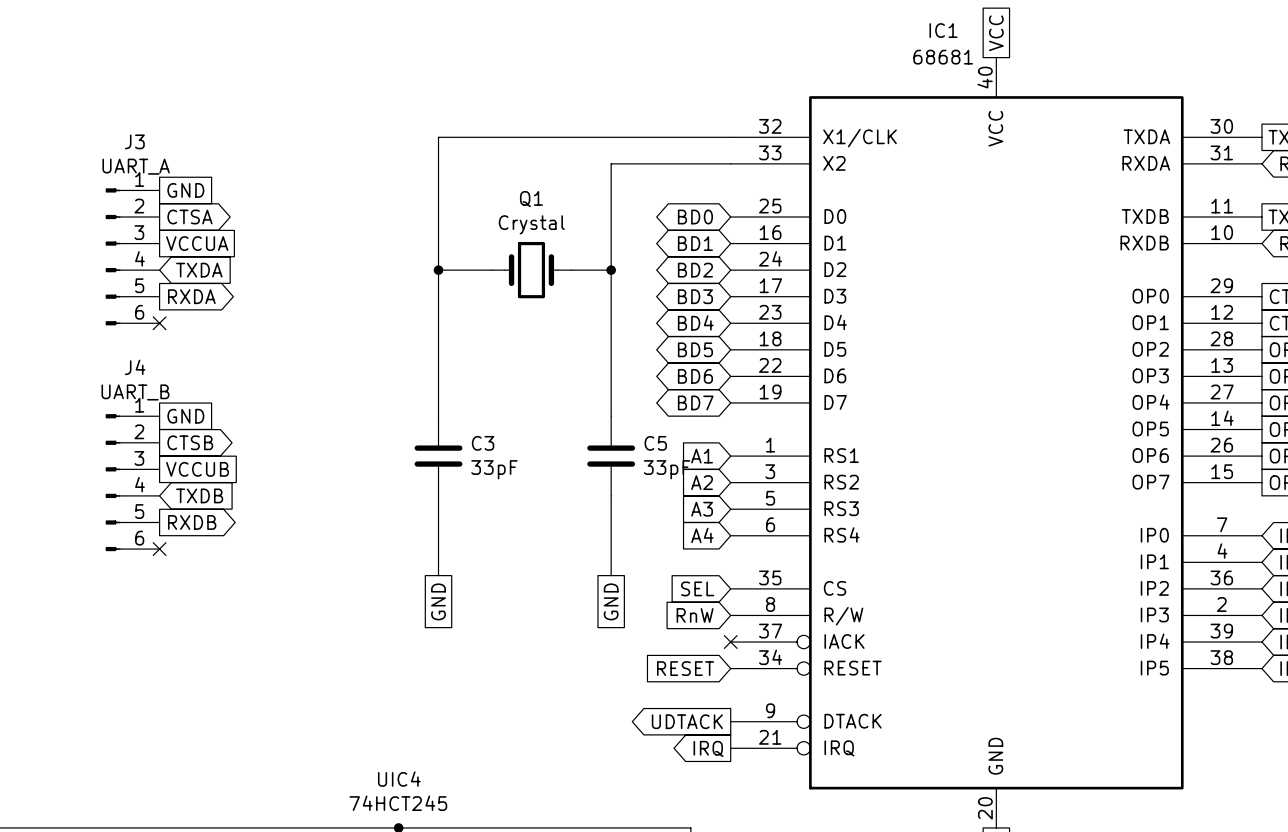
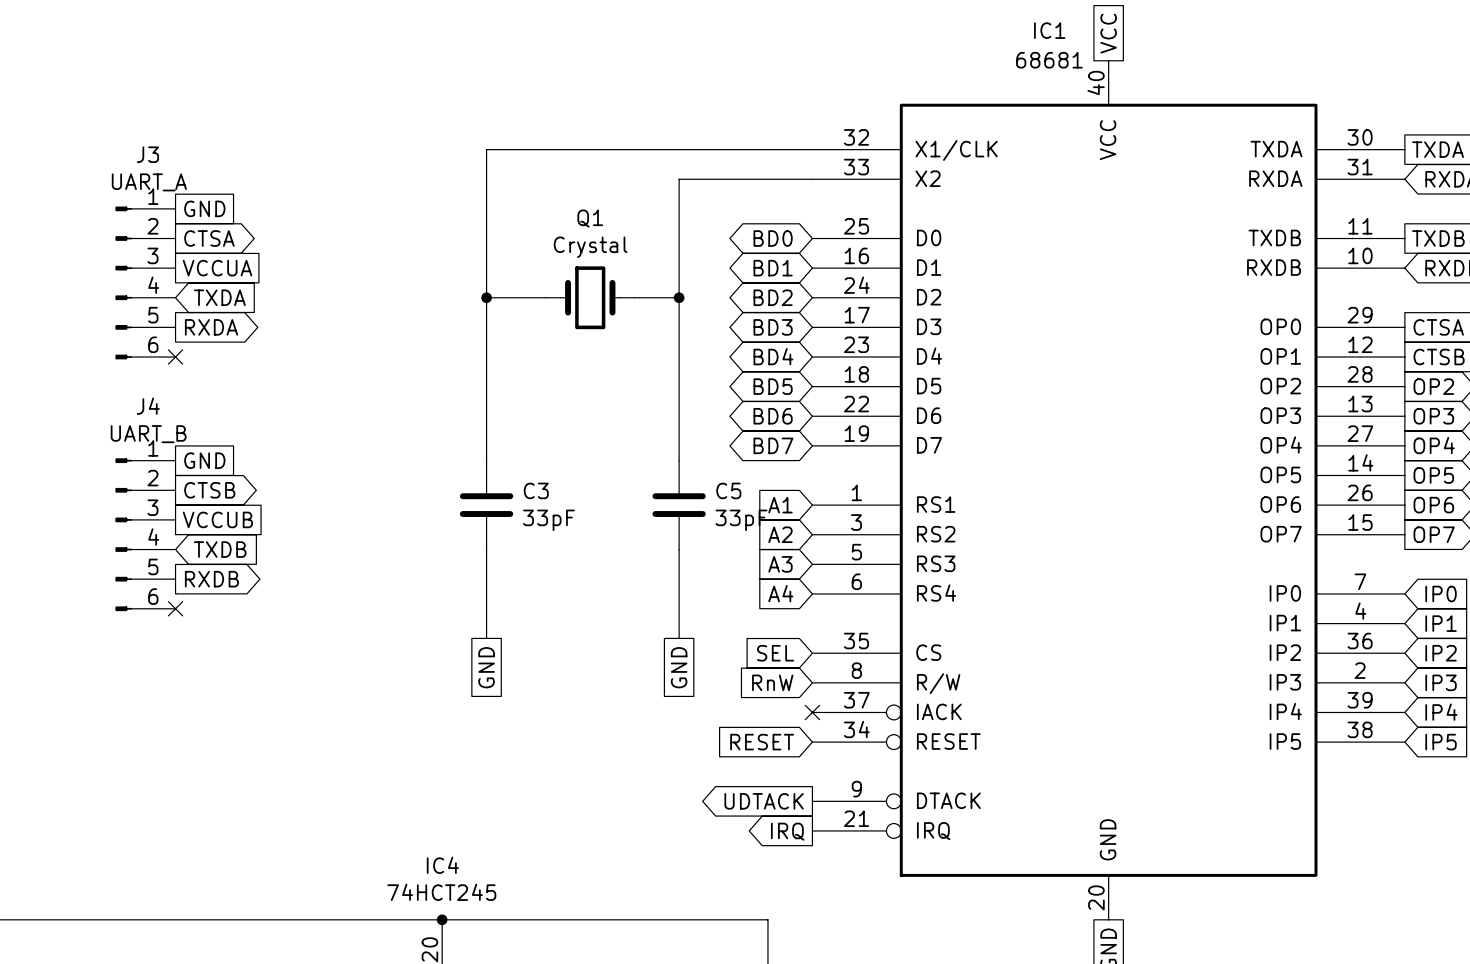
UIC4 name: UIC4 (399, 779) -> IC4 (442, 865)

